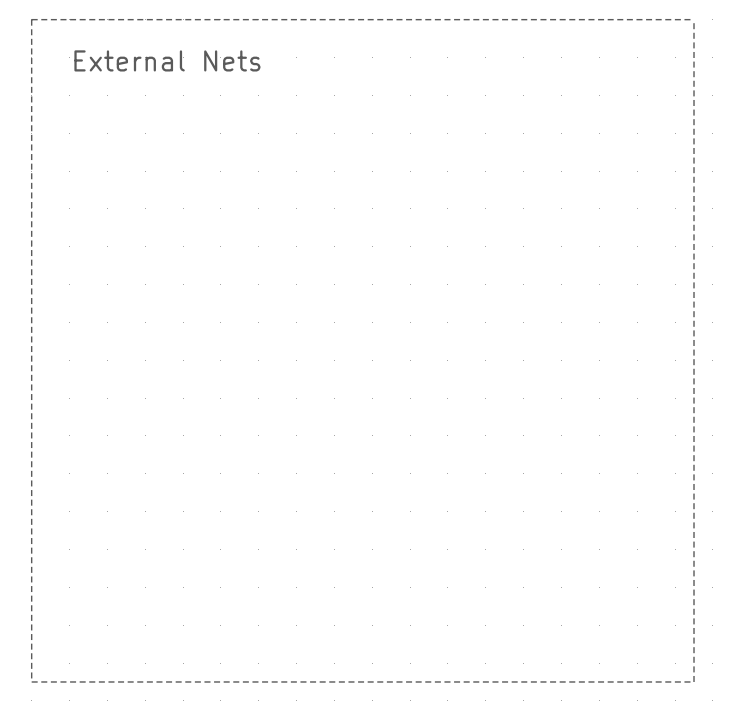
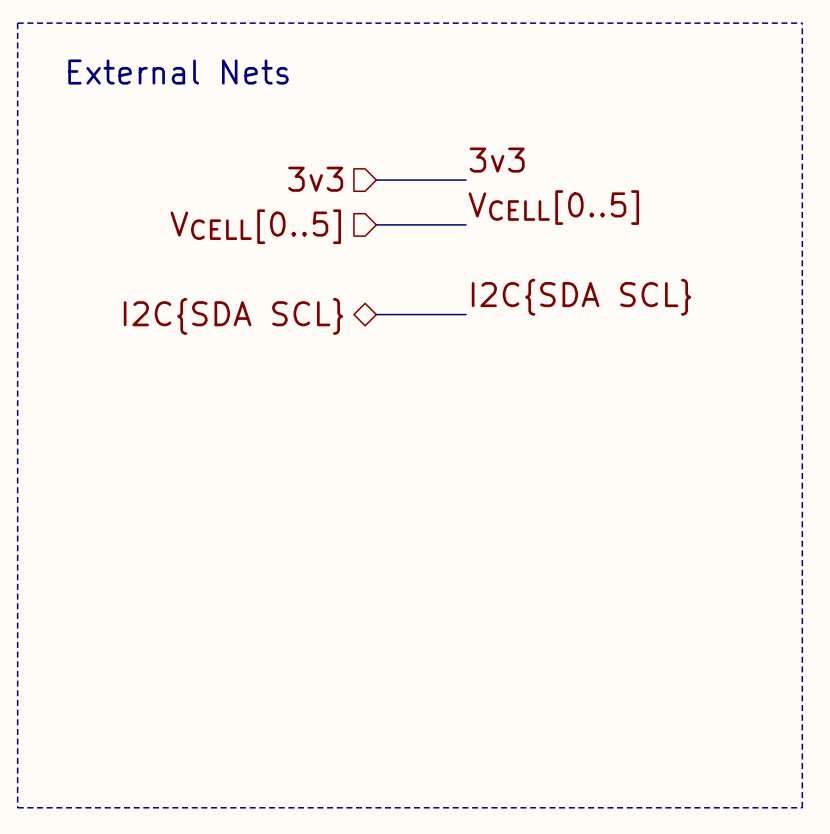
label: none -> 3v3 (497, 160)
hierarchical label: none -> 3v3 (315, 179)
wire: none -> (376, 180) (466, 180)
label: none -> VCELL[0..5] (553, 207)
bus: none -> (376, 224) (466, 224)
hierarchical label: none -> VCELL[0..5] (255, 226)
label: none -> I2C{SDA SCL} (581, 297)
bus: none -> (376, 314) (466, 314)
hierarchical label: none -> I2C{SDA SCL} (233, 316)

